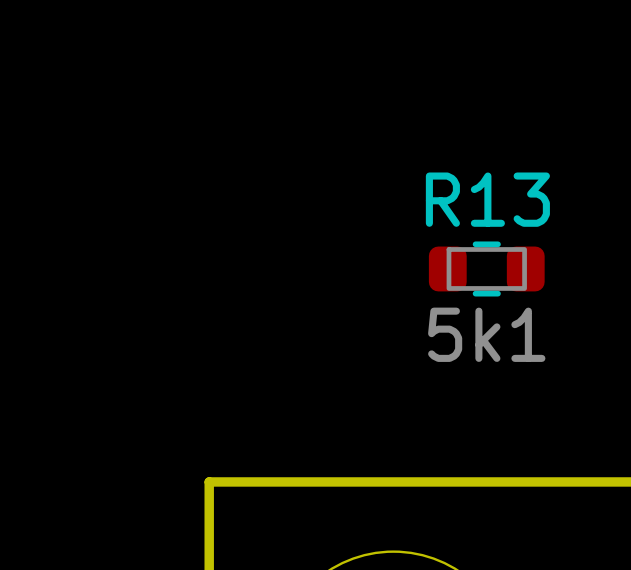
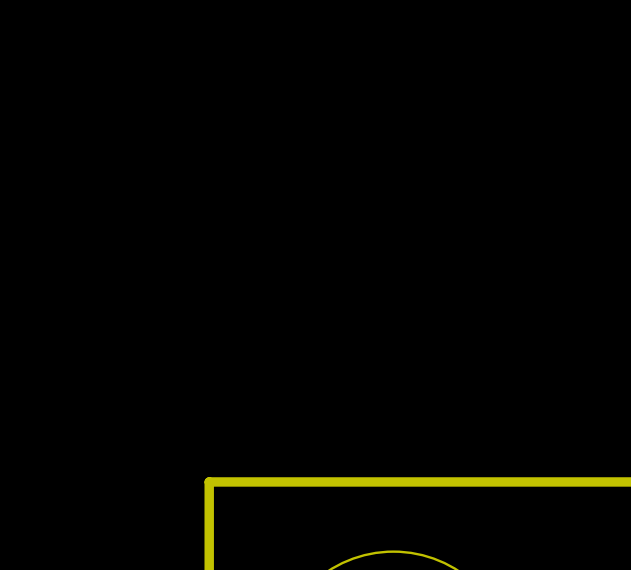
R13: 5k1 (486, 268) -> none

